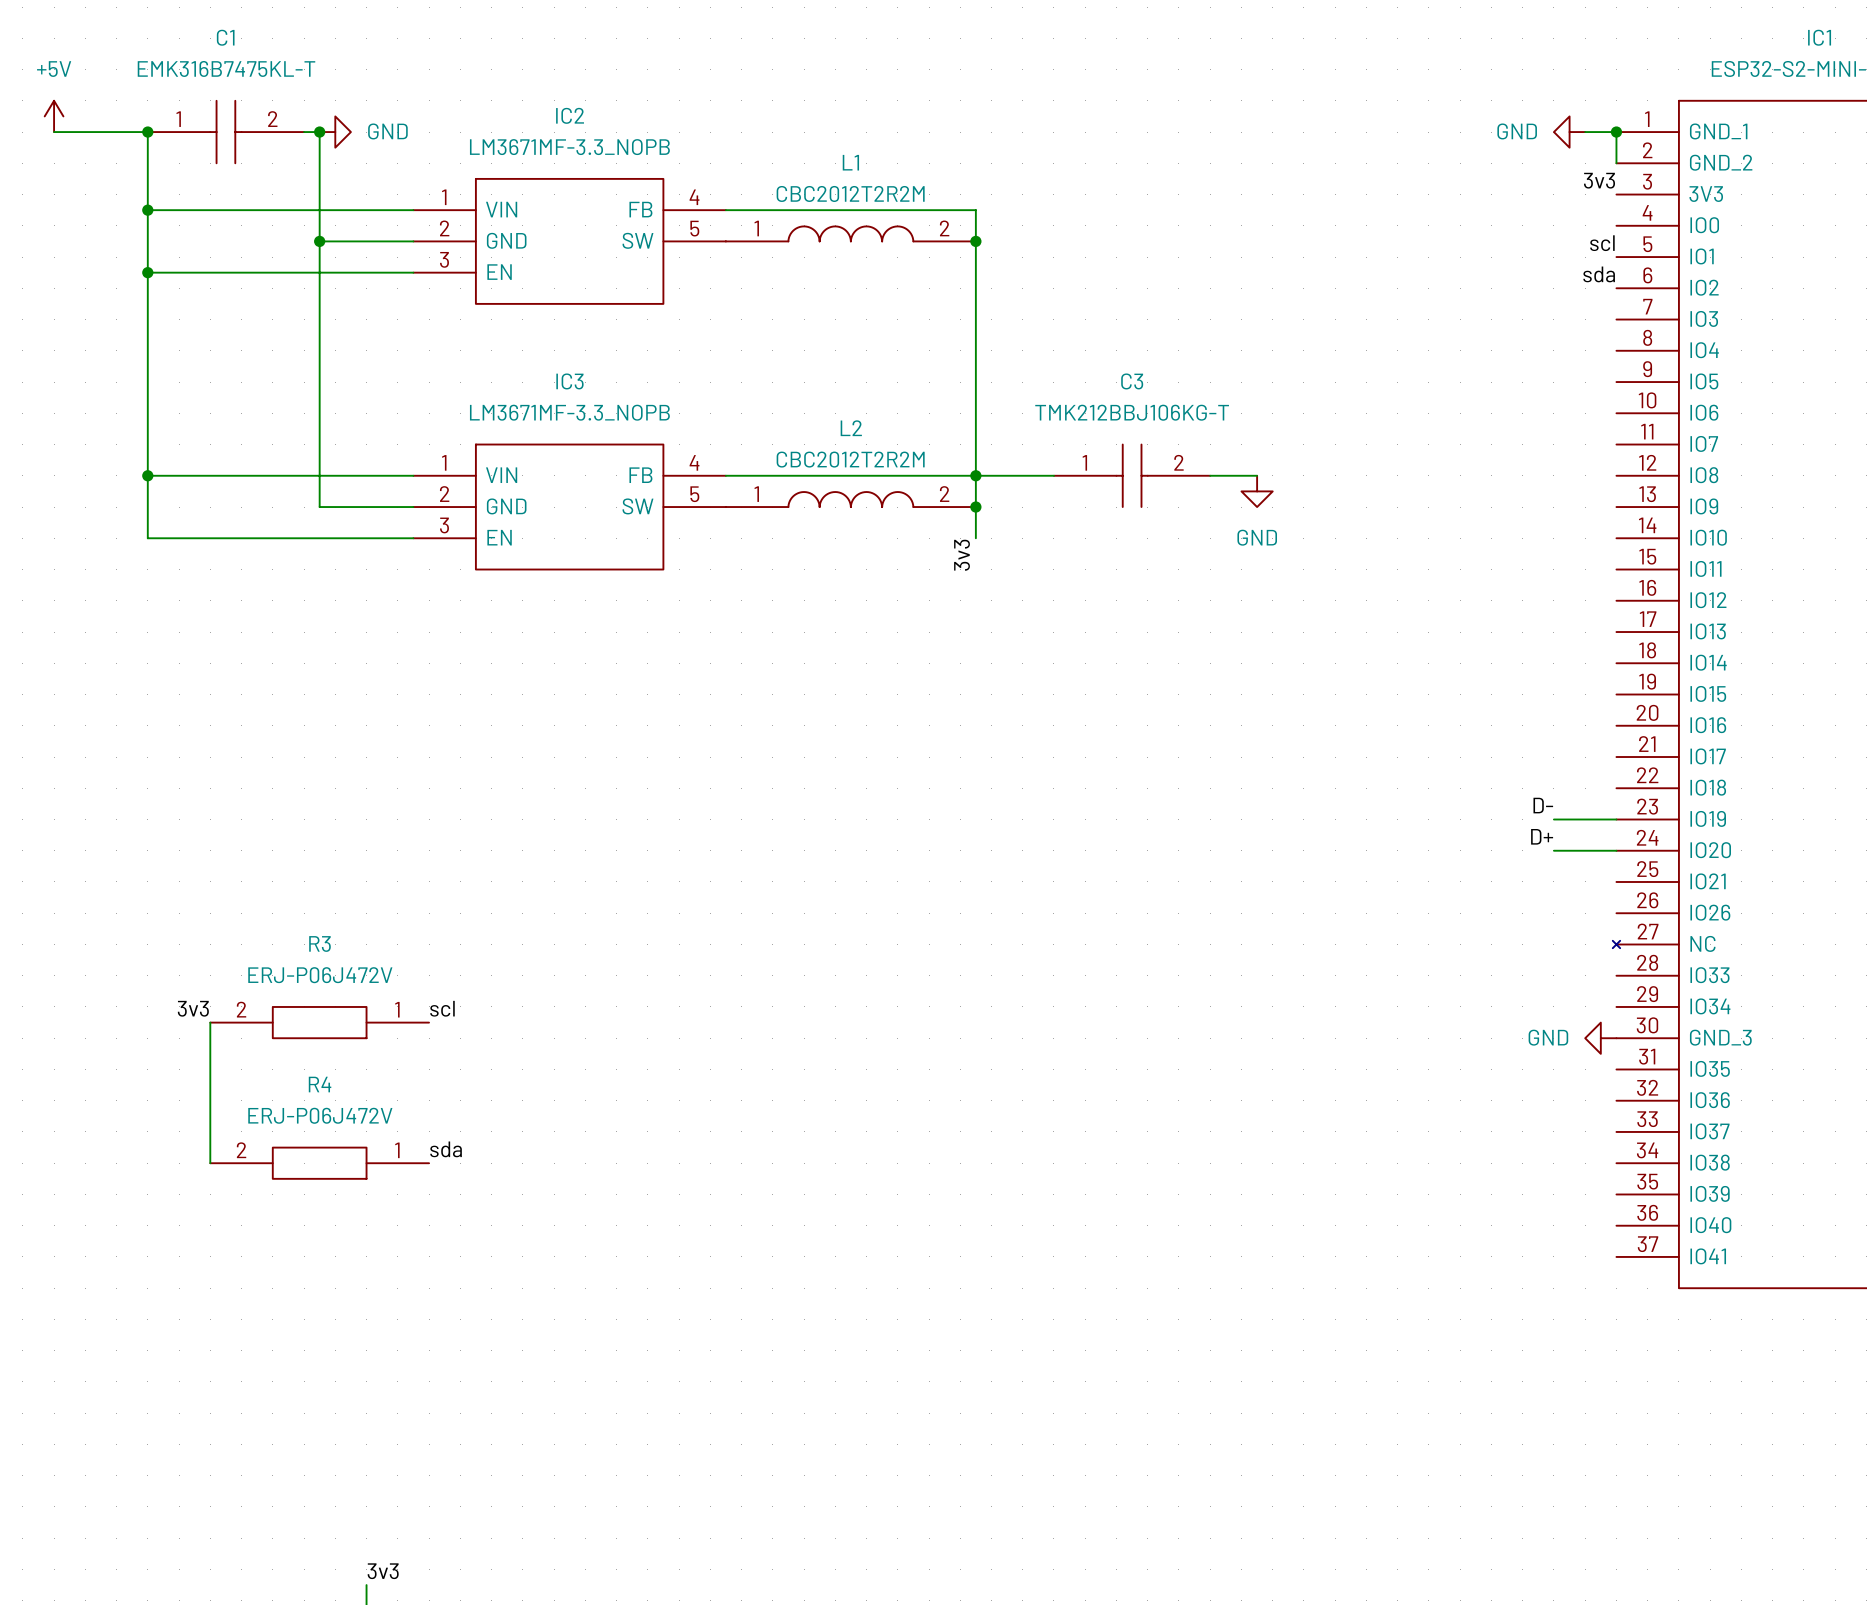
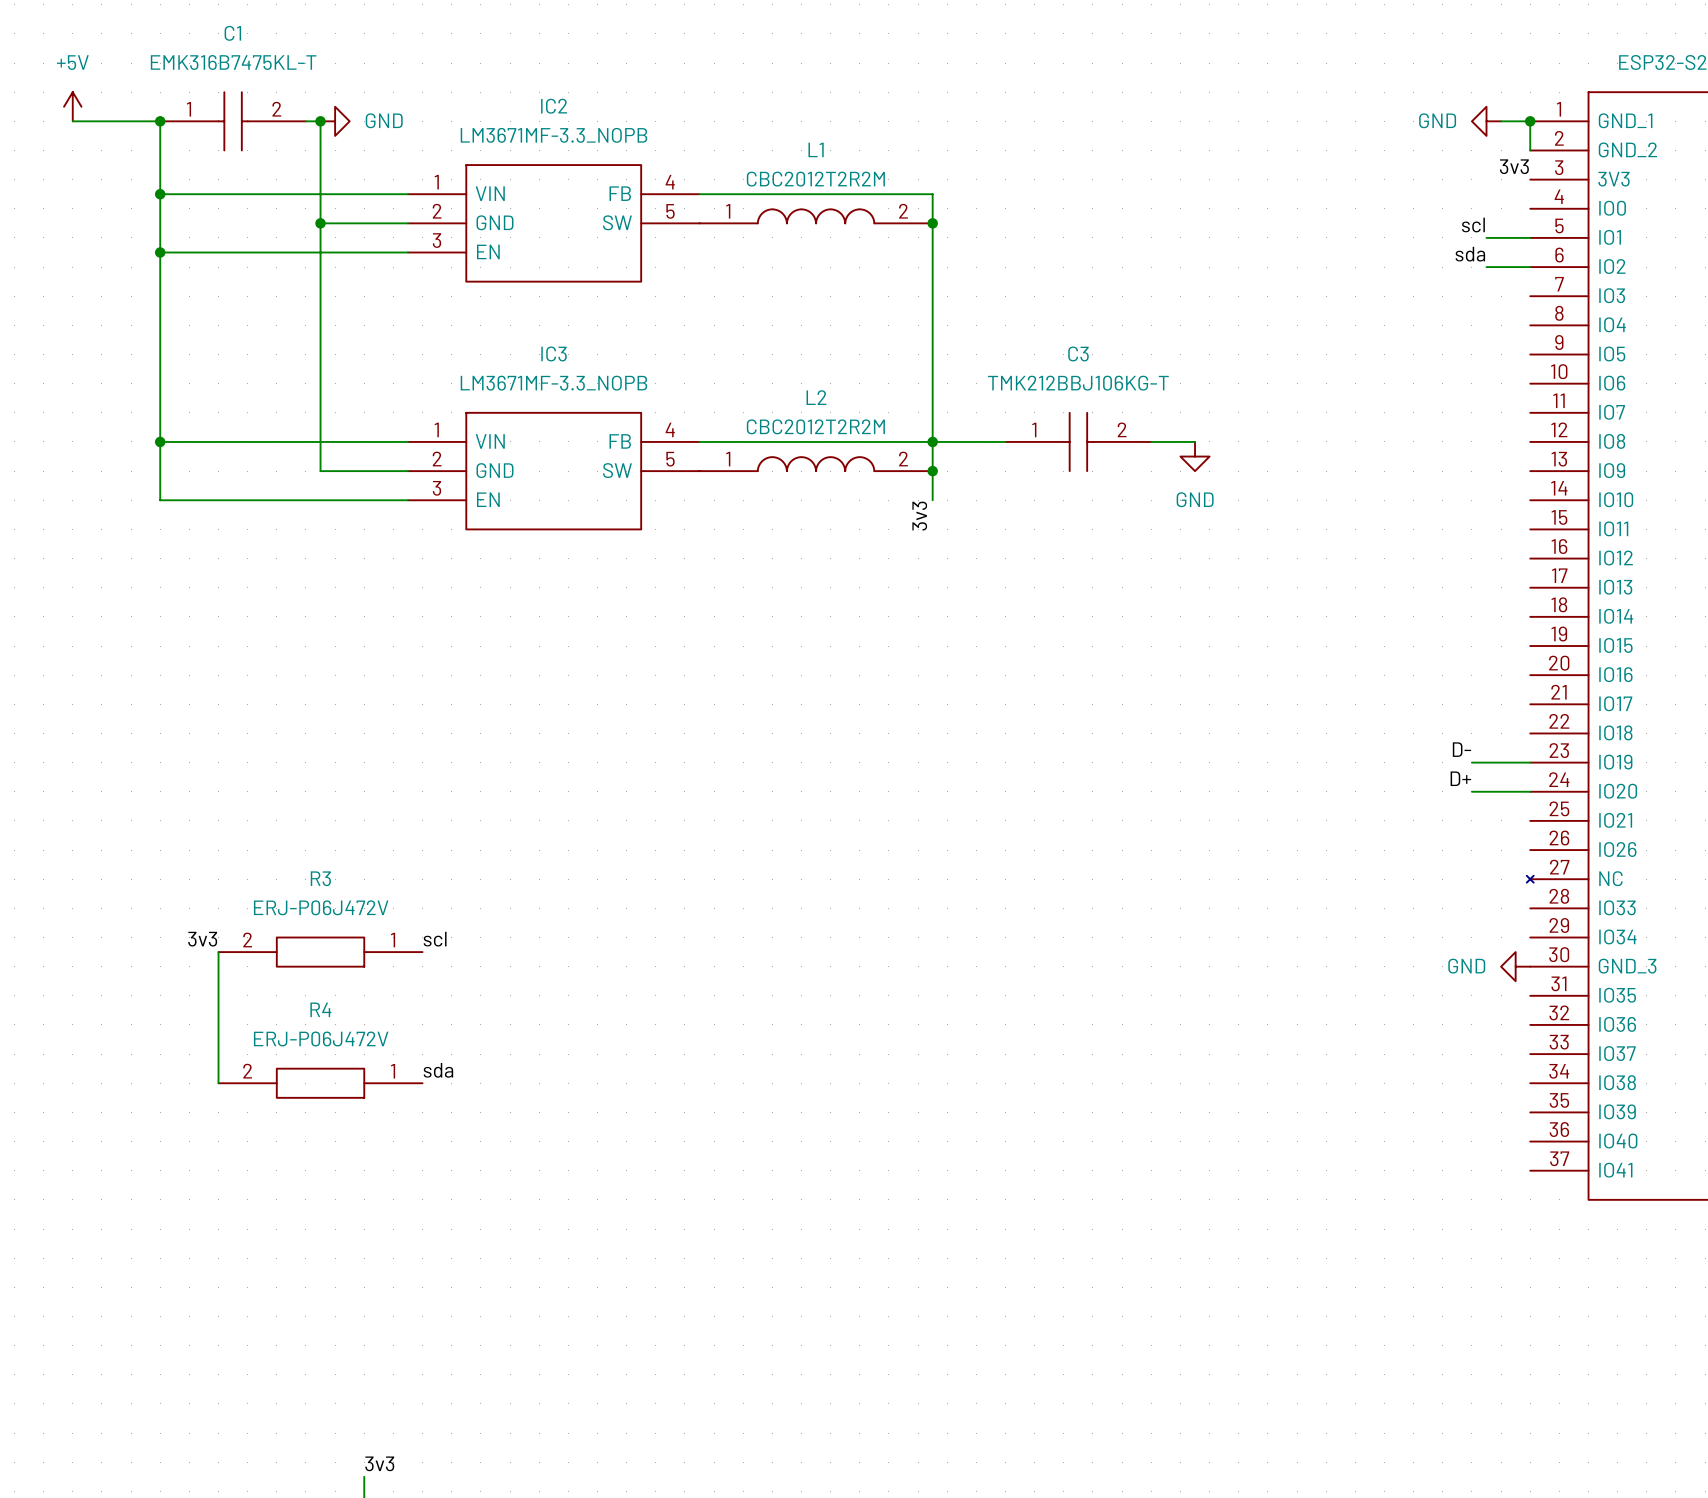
label position: scl (1602, 243) -> scl (1473, 225)
wire: none -> (1486, 237) (1530, 237)
label position: sda (1599, 274) -> sda (1470, 254)
wire: none -> (1486, 267) (1530, 267)

